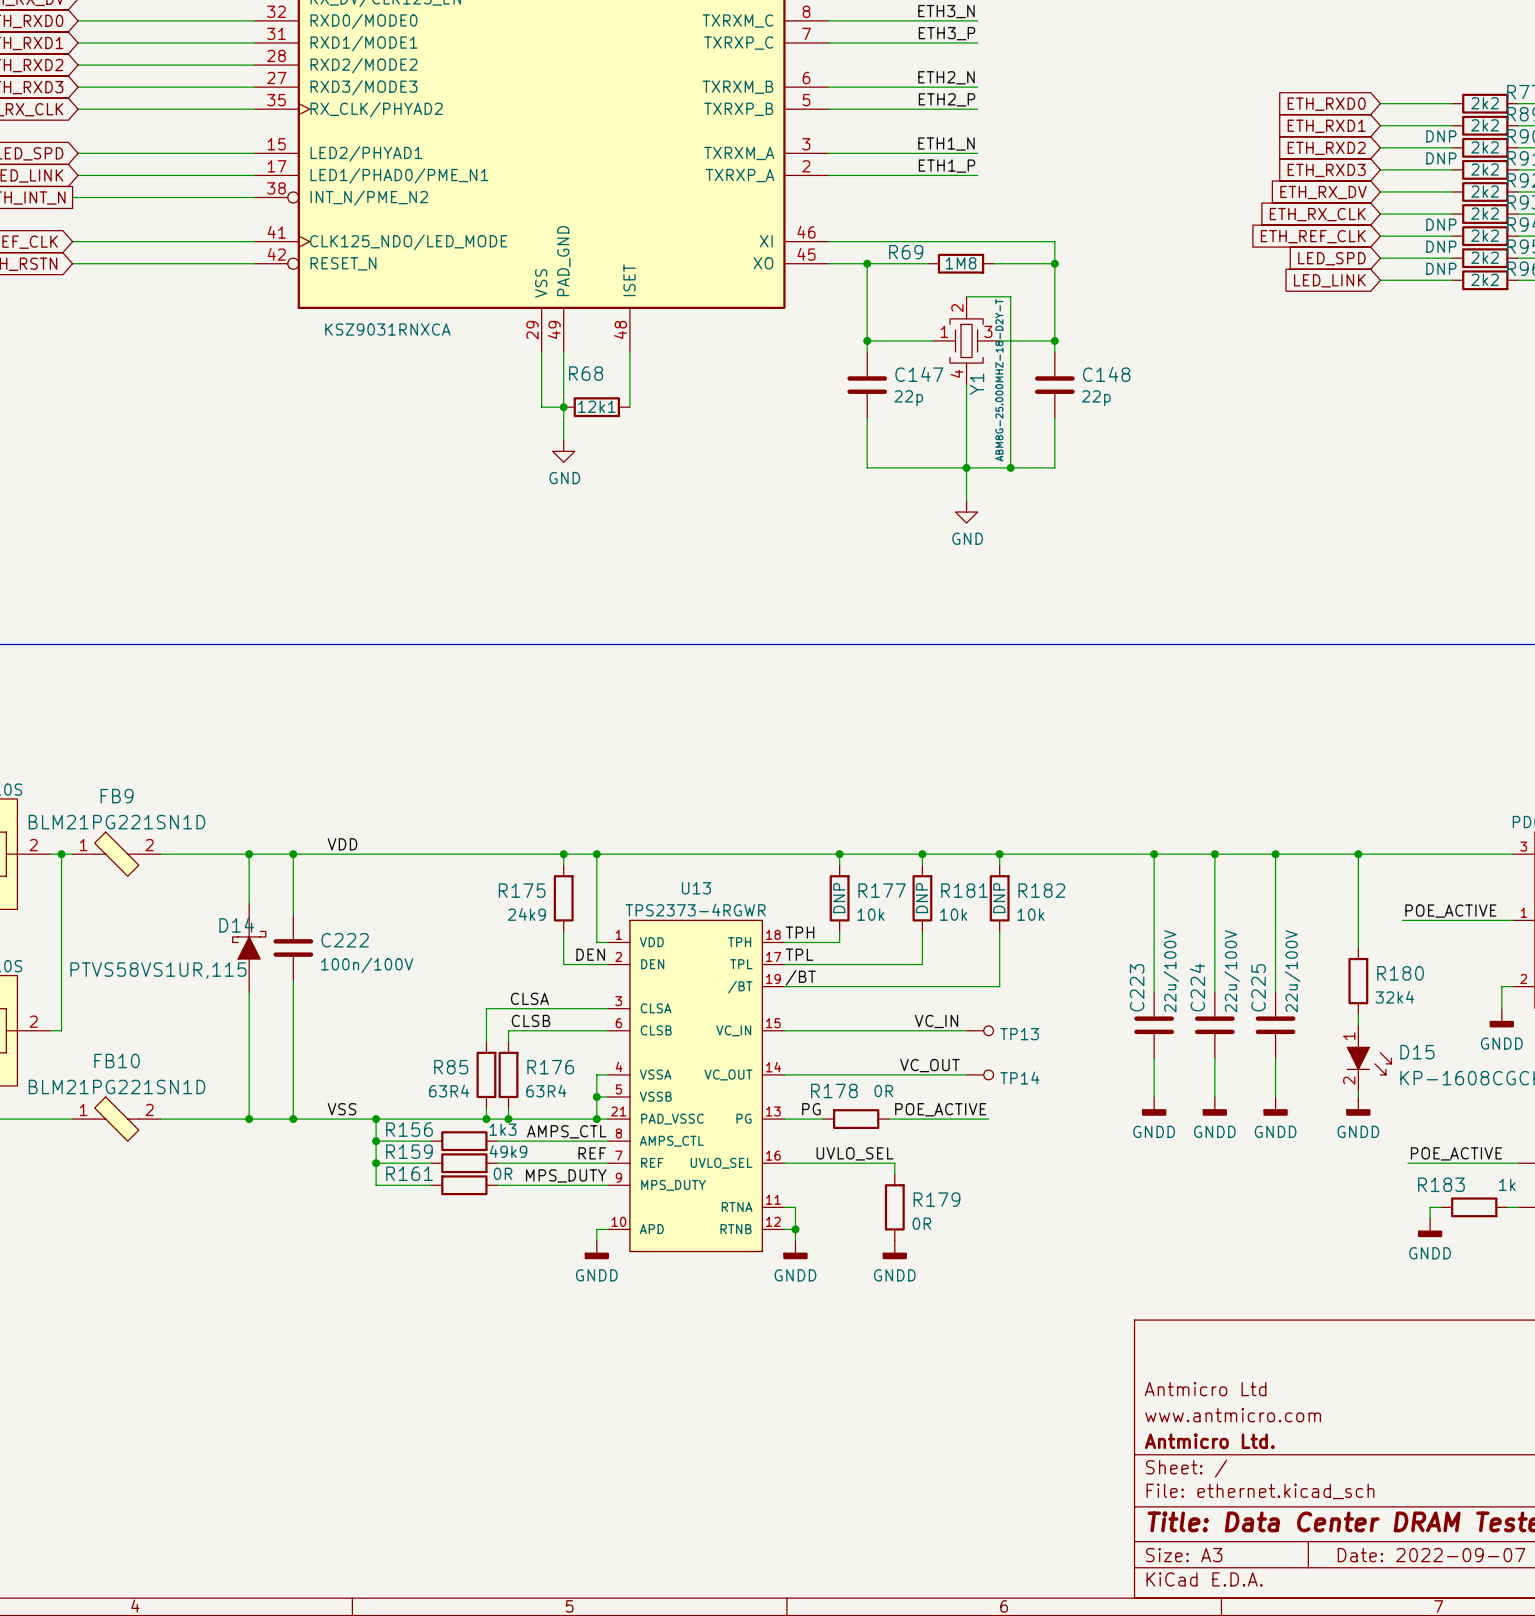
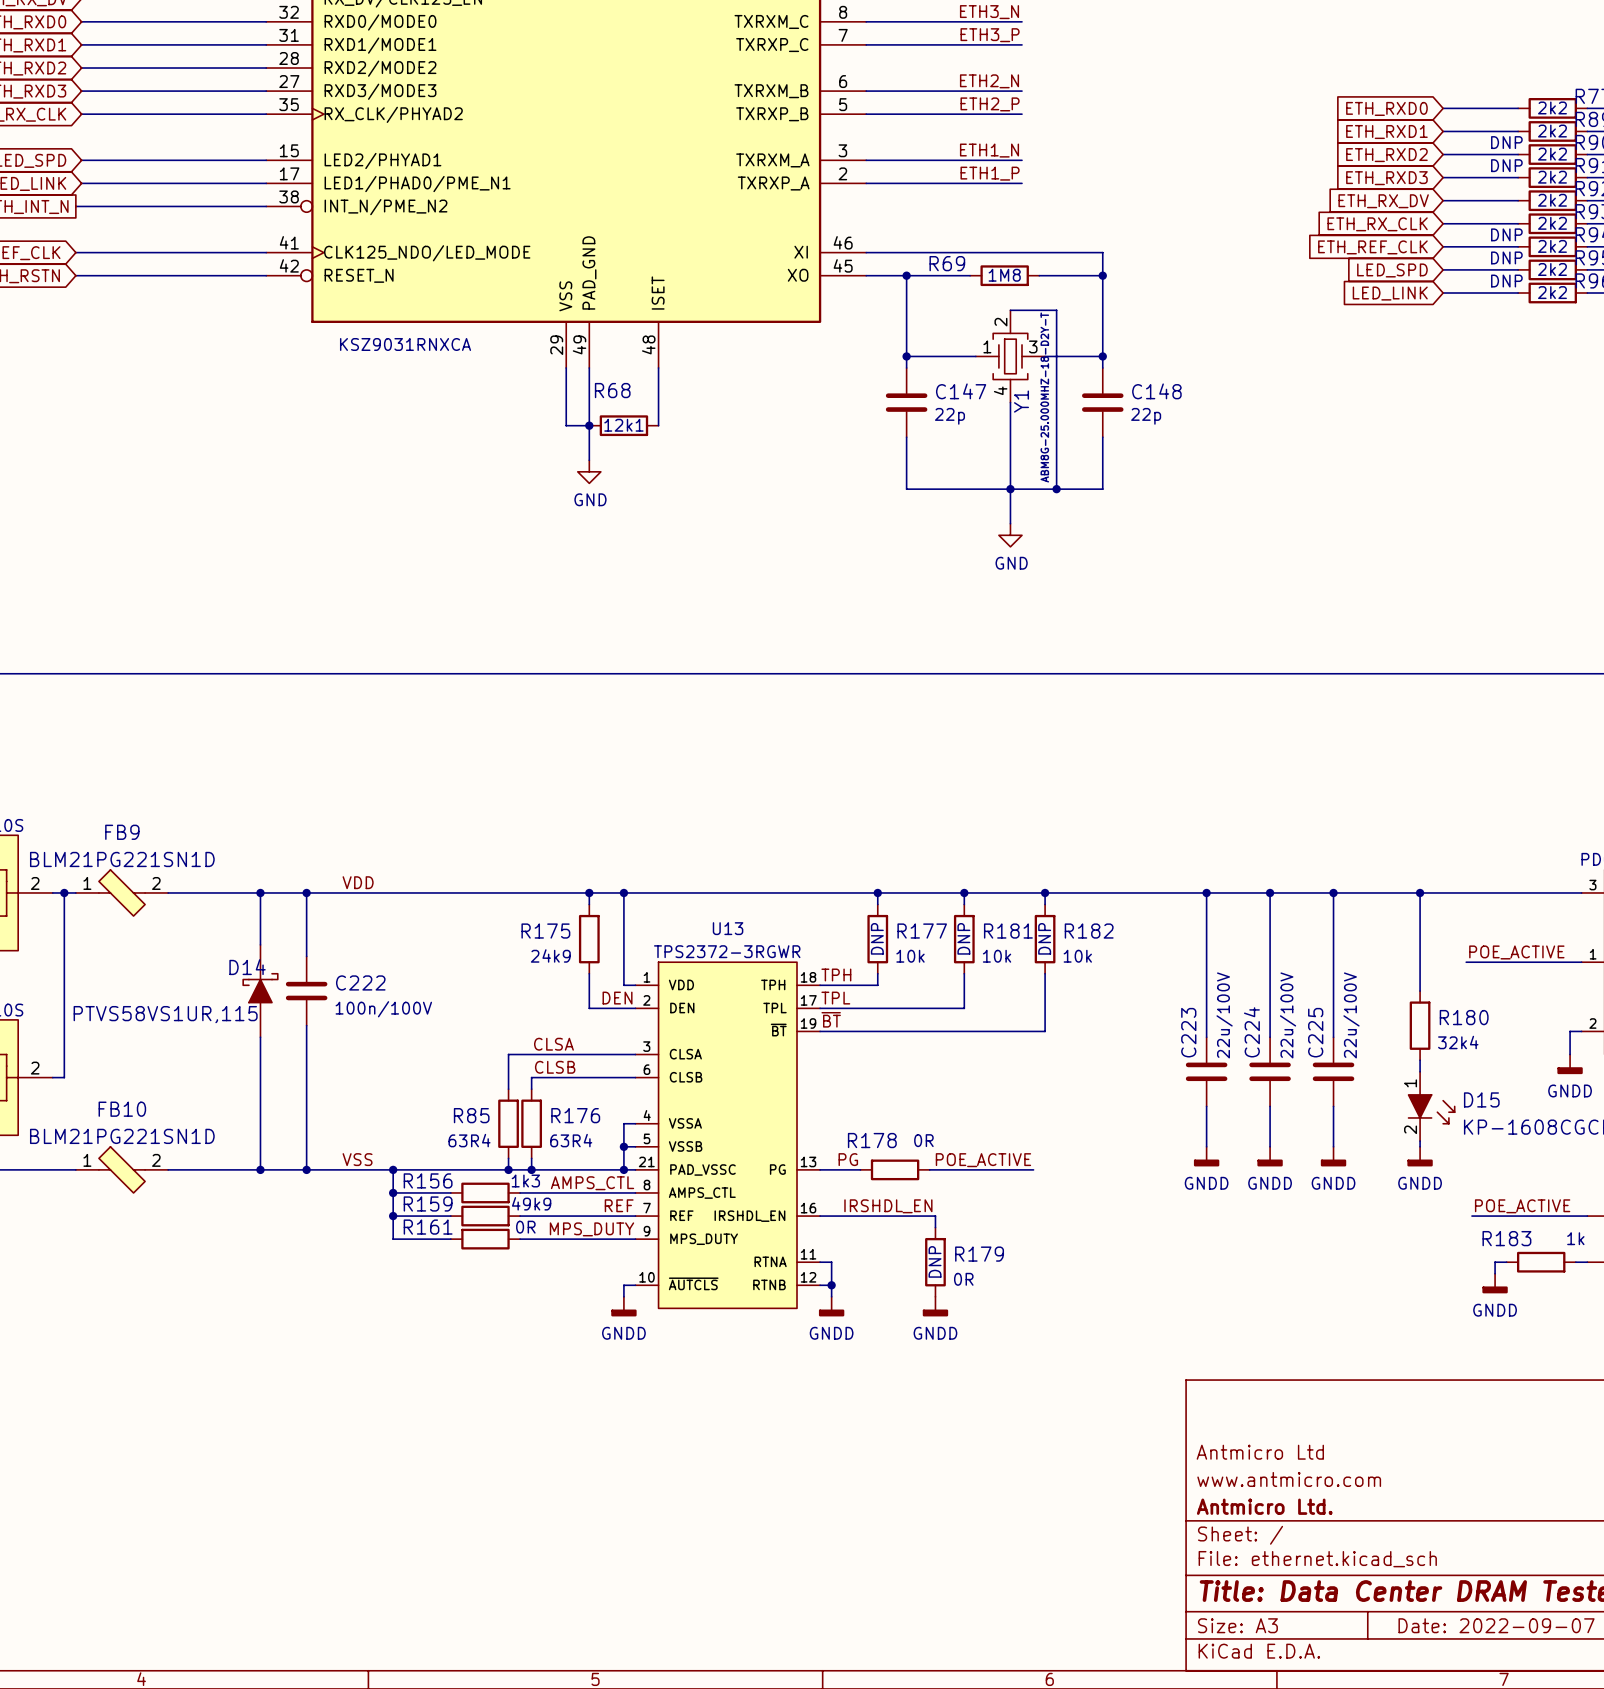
U13 value: TPS2373-4RGWR (695, 910) -> TPS2372-3RGWR (727, 951)
U13 symbol: [607, 919, 785, 1253] -> [635, 961, 821, 1310]
label: /BT (800, 977) -> ~{BT} (831, 1019)
label: VC_IN (936, 1021) -> none
wire: (784, 1030) (966, 1030) -> none
TP13: (980, 1030) -> none
label: VC_OUT (929, 1065) -> none
wire: (784, 1074) (966, 1074) -> none
TP14: (980, 1074) -> none
label: UVLO_SEL (855, 1153) -> IRSHDL_EN (888, 1206)
R179 text: none -> DNP (935, 1261)

